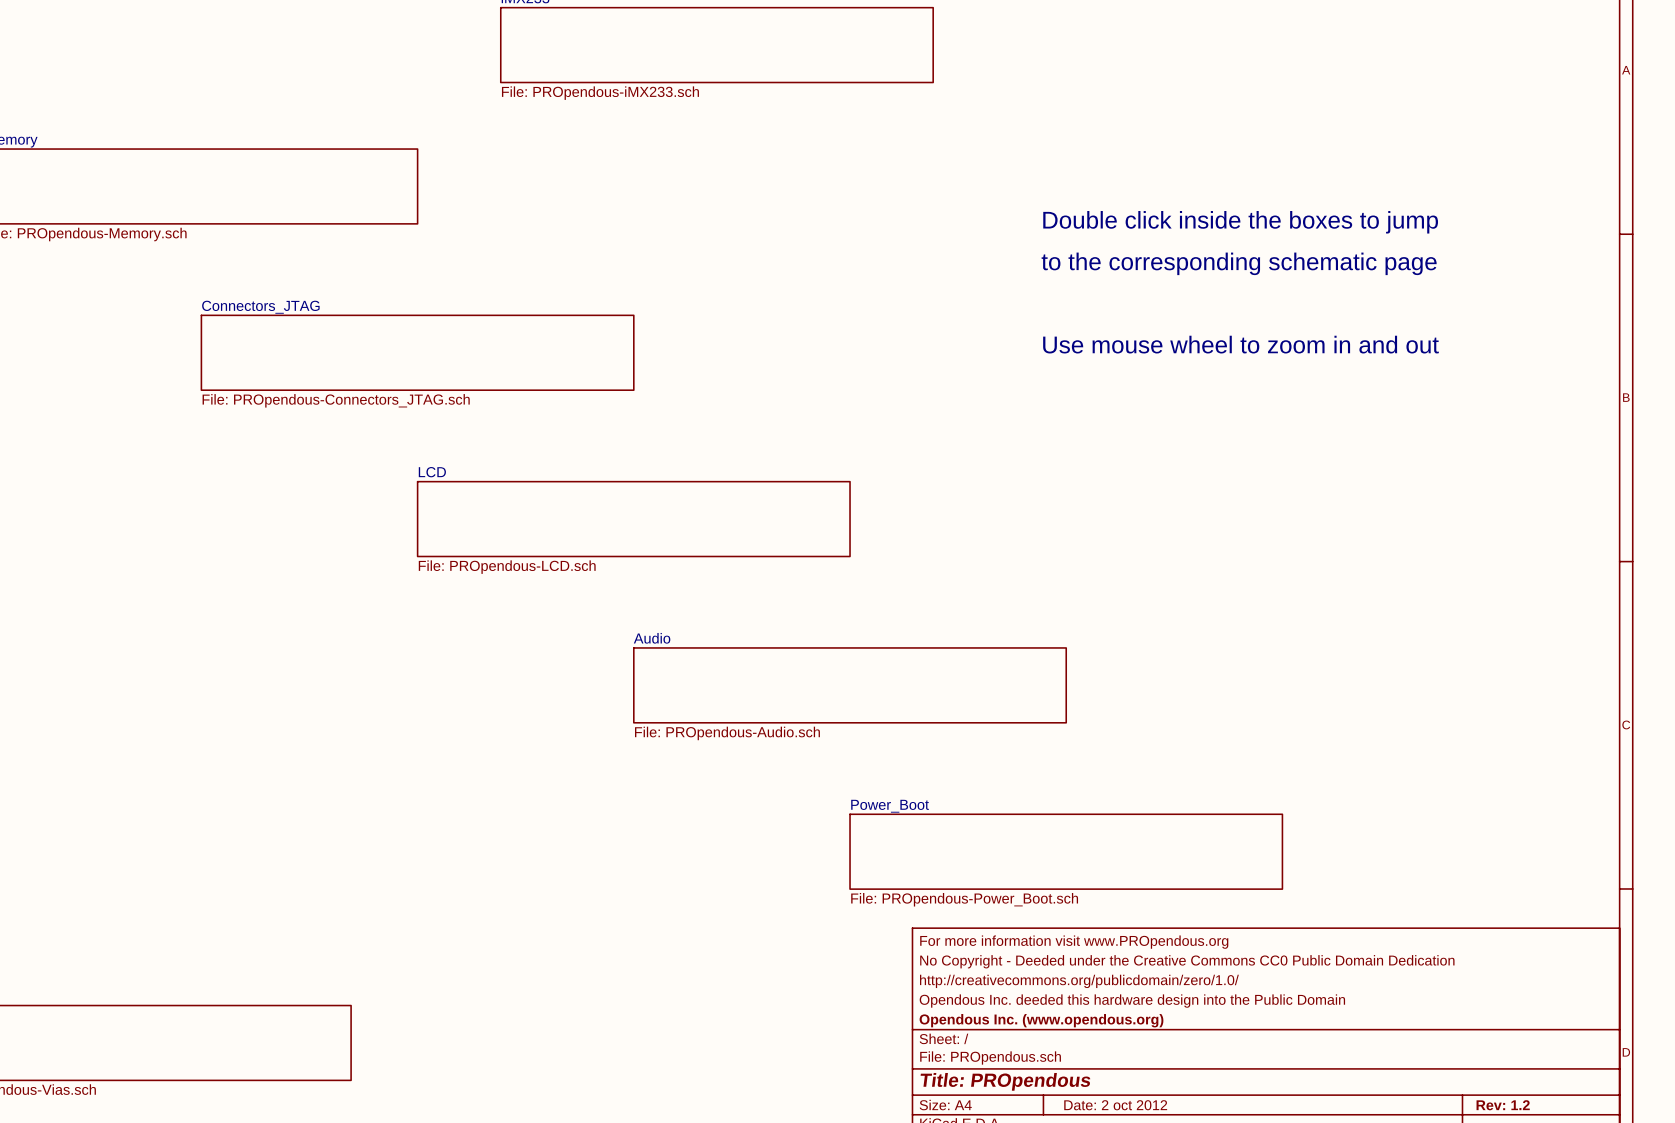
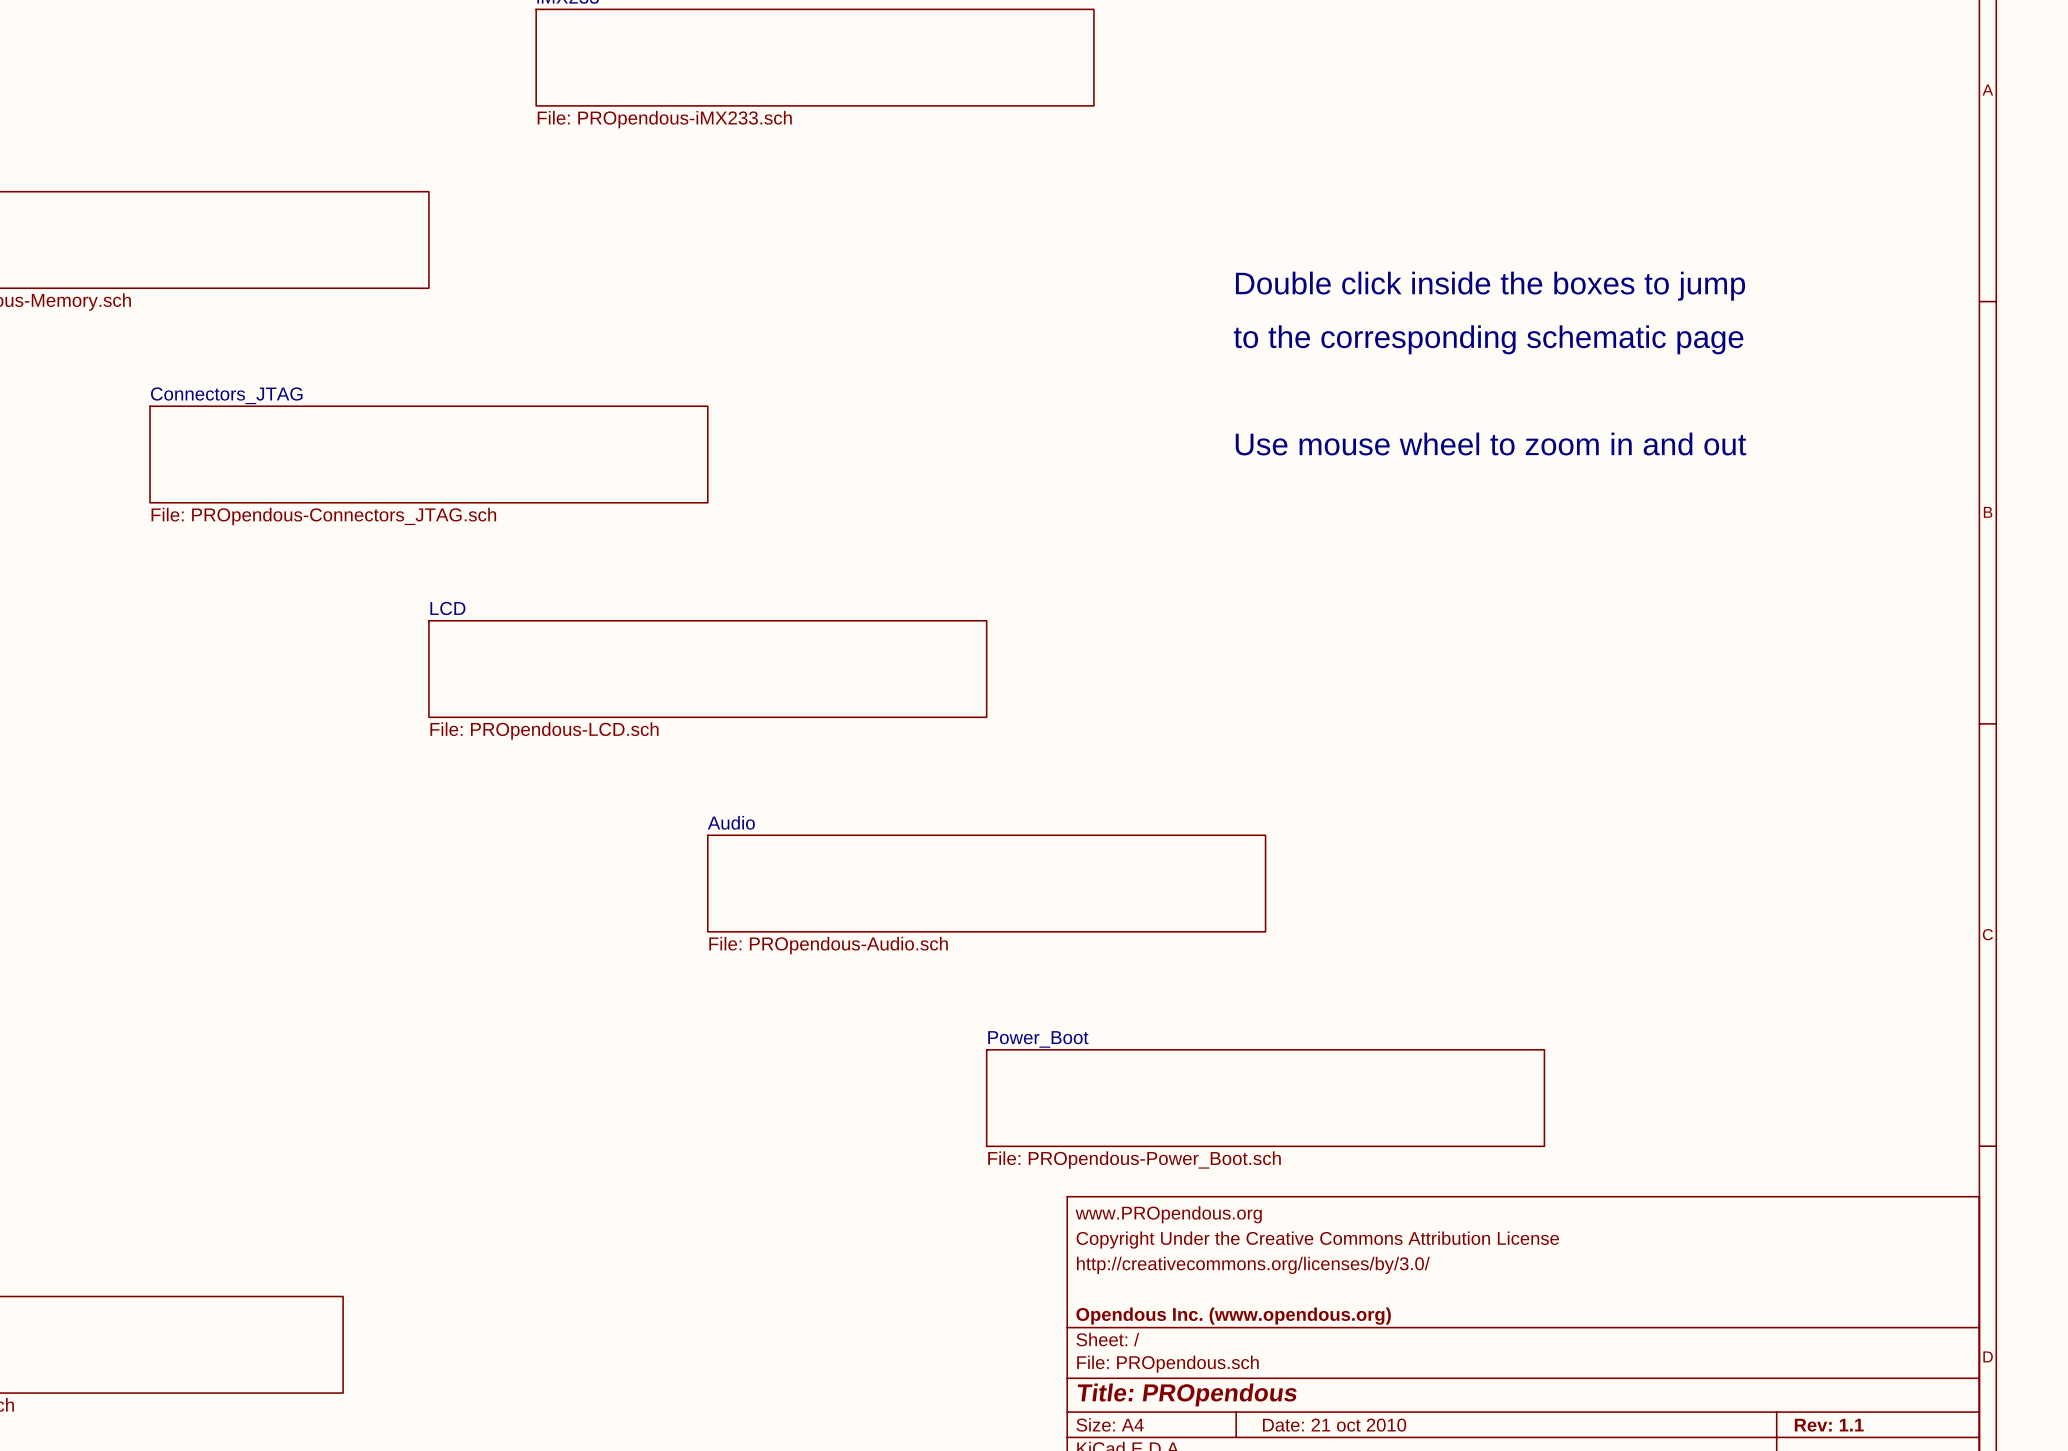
title block: For more information visit www.PROpendous.org (1074, 942) -> www.PROpendous.org (1168, 1214)
title block: No Copyright - Deeded under the Creative Commons CC0 Public Domain Dedication (1187, 961) -> Copyright Under the Creative Commons Attribution License (1317, 1240)
title block: http://creativecommons.org/publicdomain/zero/1.0/ (1079, 981) -> http://creativecommons.org/licenses/by/3.0/ (1253, 1265)
title block: Opendous Inc. deeded this hardware design into the Public Domain (1132, 1001) -> none
title block: Date: 2 oct 2012 (1115, 1105) -> Date: 21 oct 2010 (1334, 1425)
title block: Rev: 1.2 (1503, 1105) -> Rev: 1.1 (1829, 1425)

